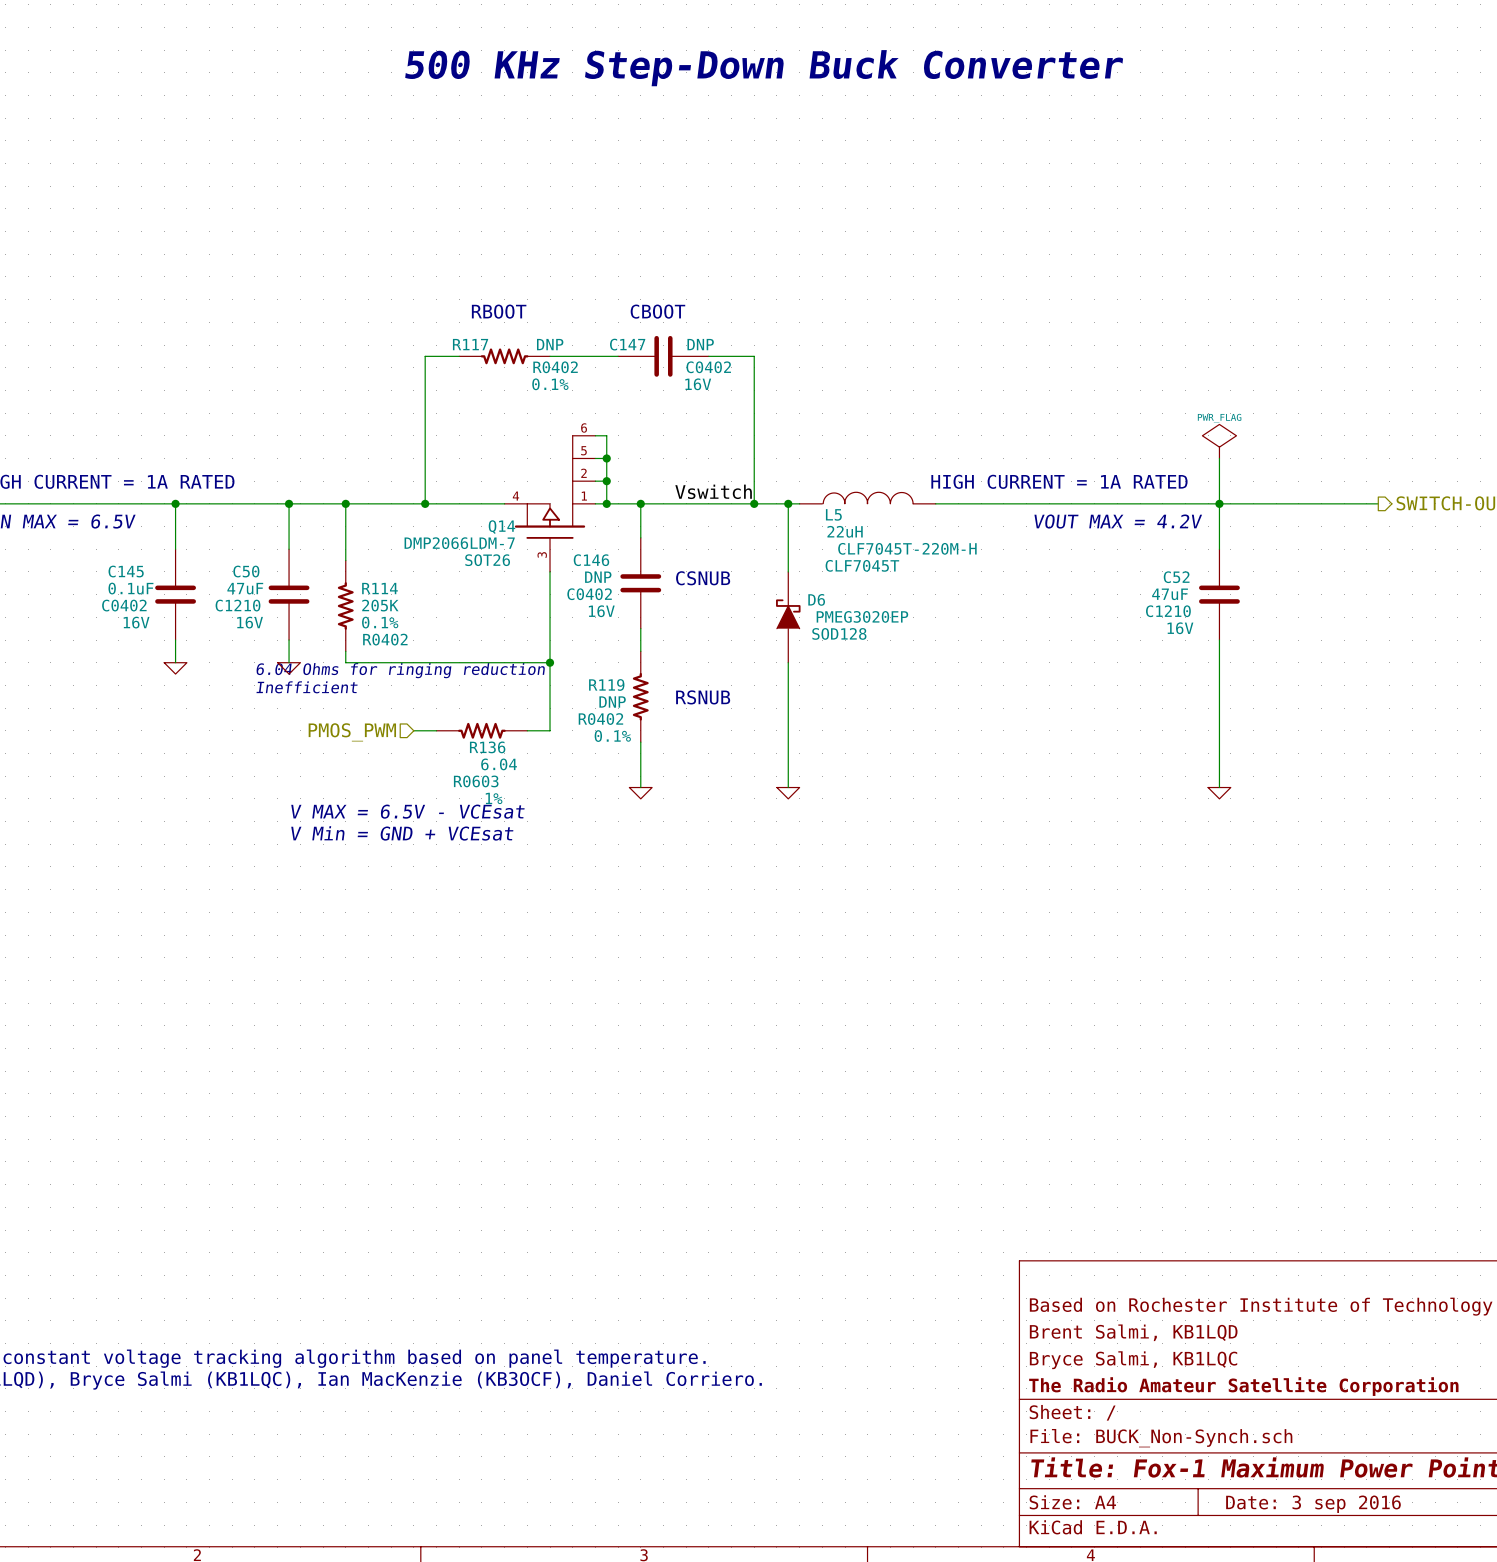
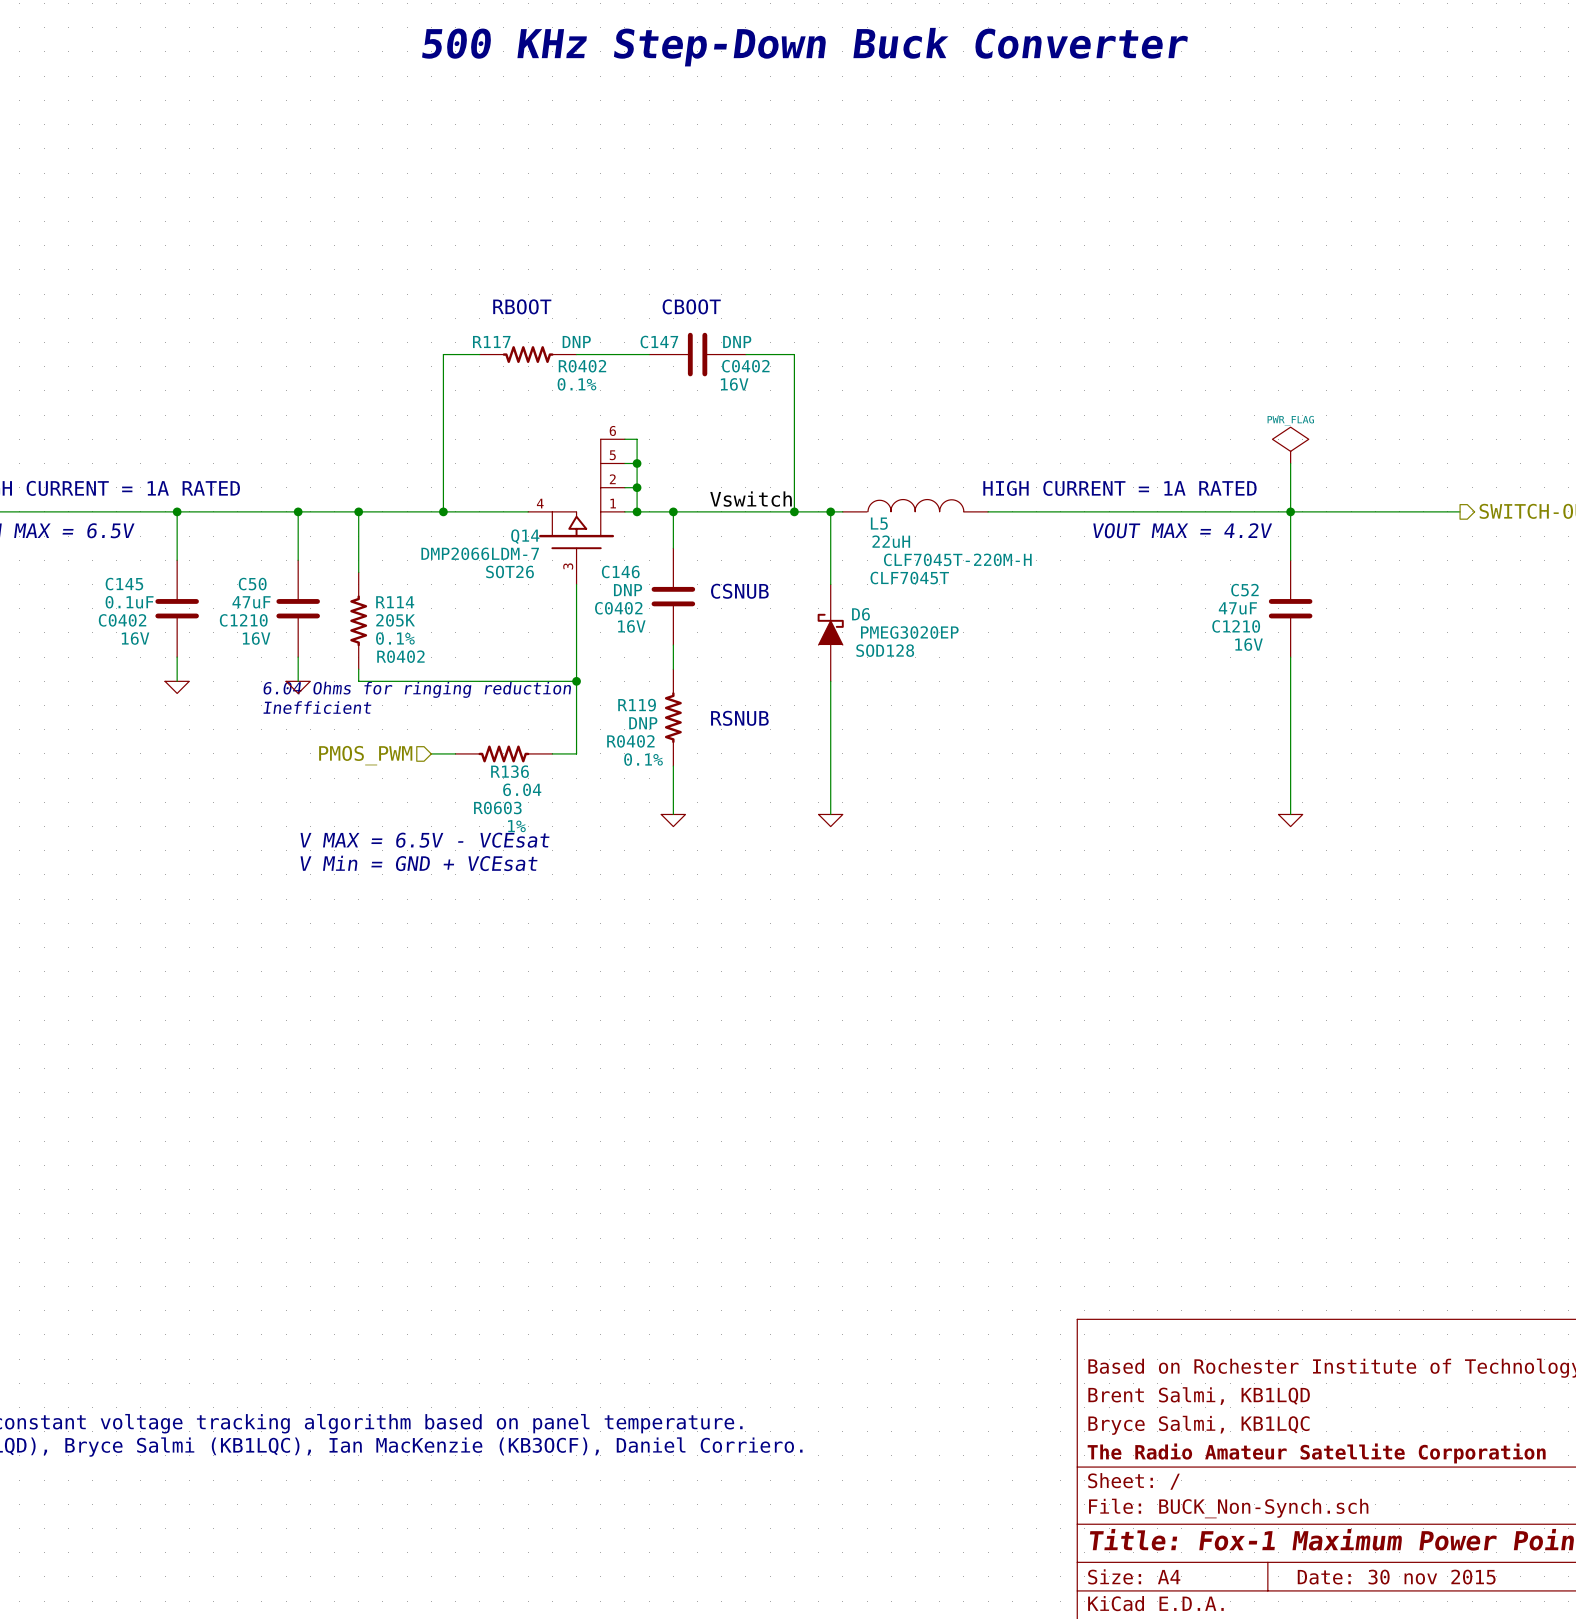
title block: Date: 3 sep 2016 (1313, 1504) -> Date: 30 nov 2015 (1396, 1577)

